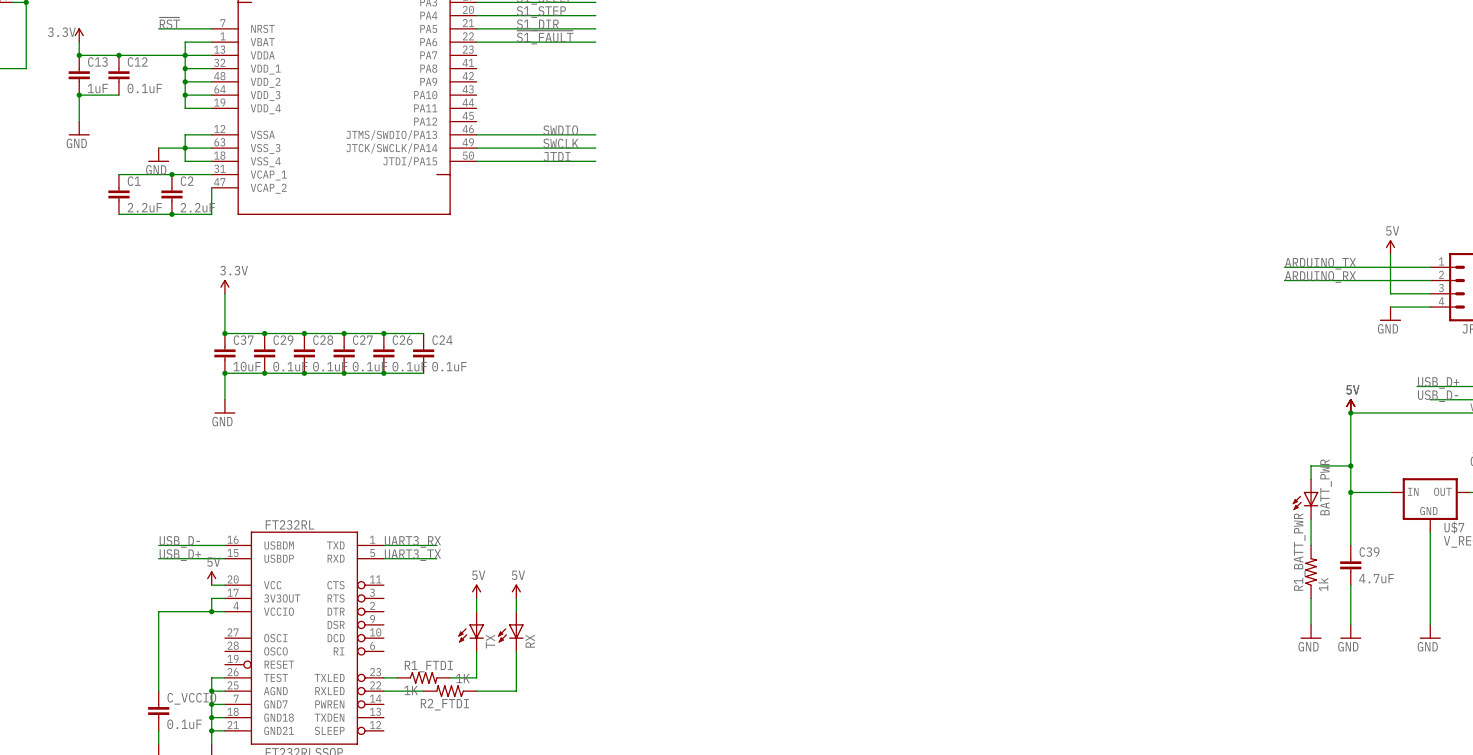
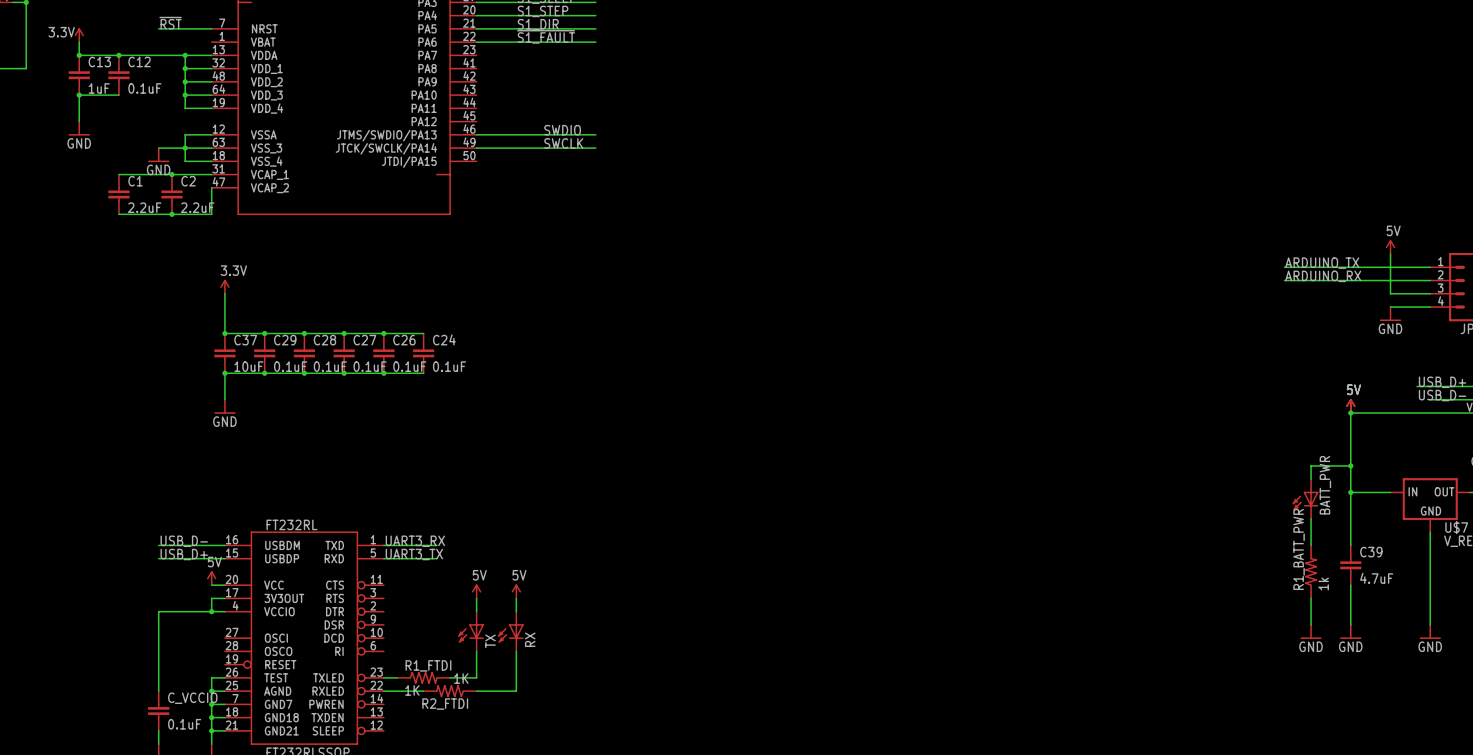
wire: (211, 42) (185, 42) (185, 55) -> none
label: JTDI (557, 156) -> none
wire: (476, 161) (595, 161) -> none

